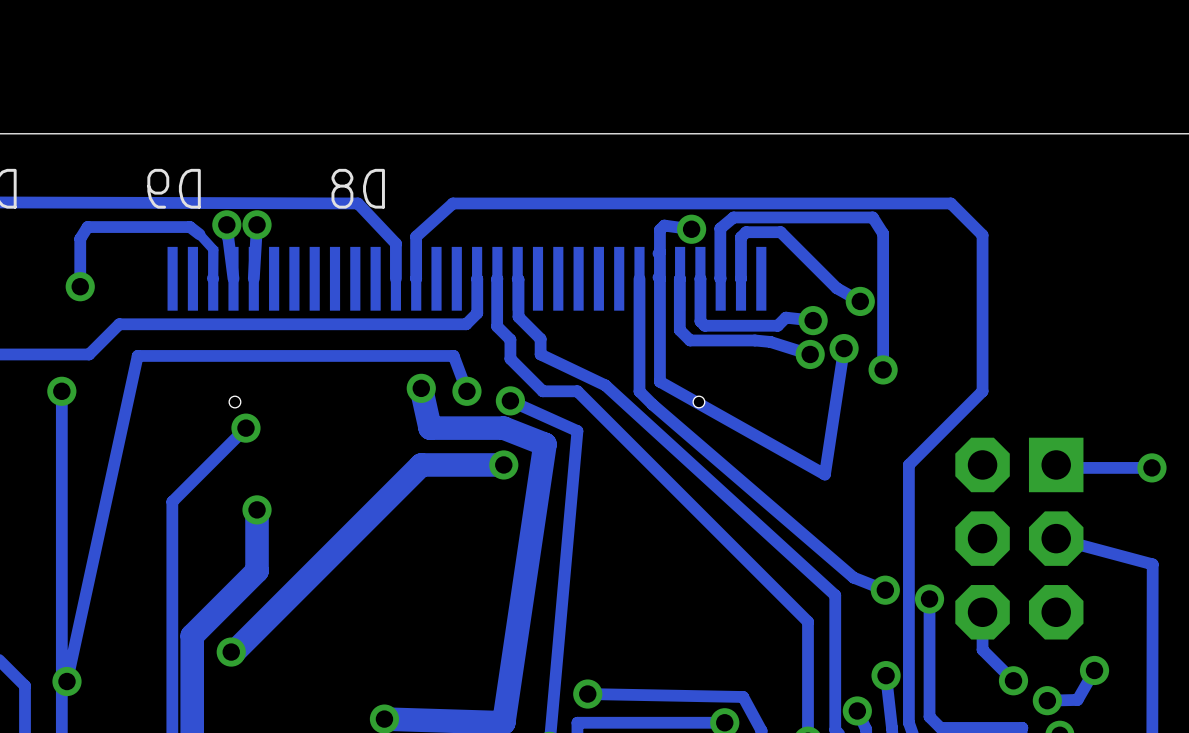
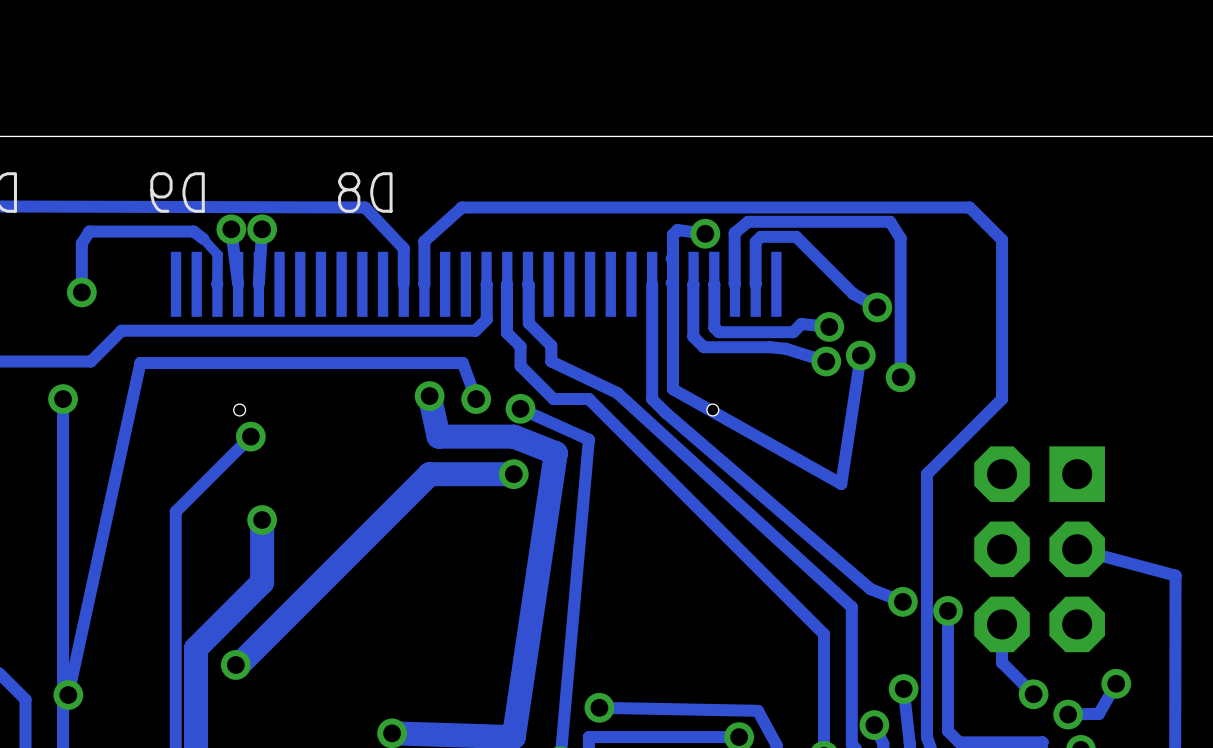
track: (1056, 464) (1059, 467) (1151, 467) -> none
via: (1151, 467) -> none

